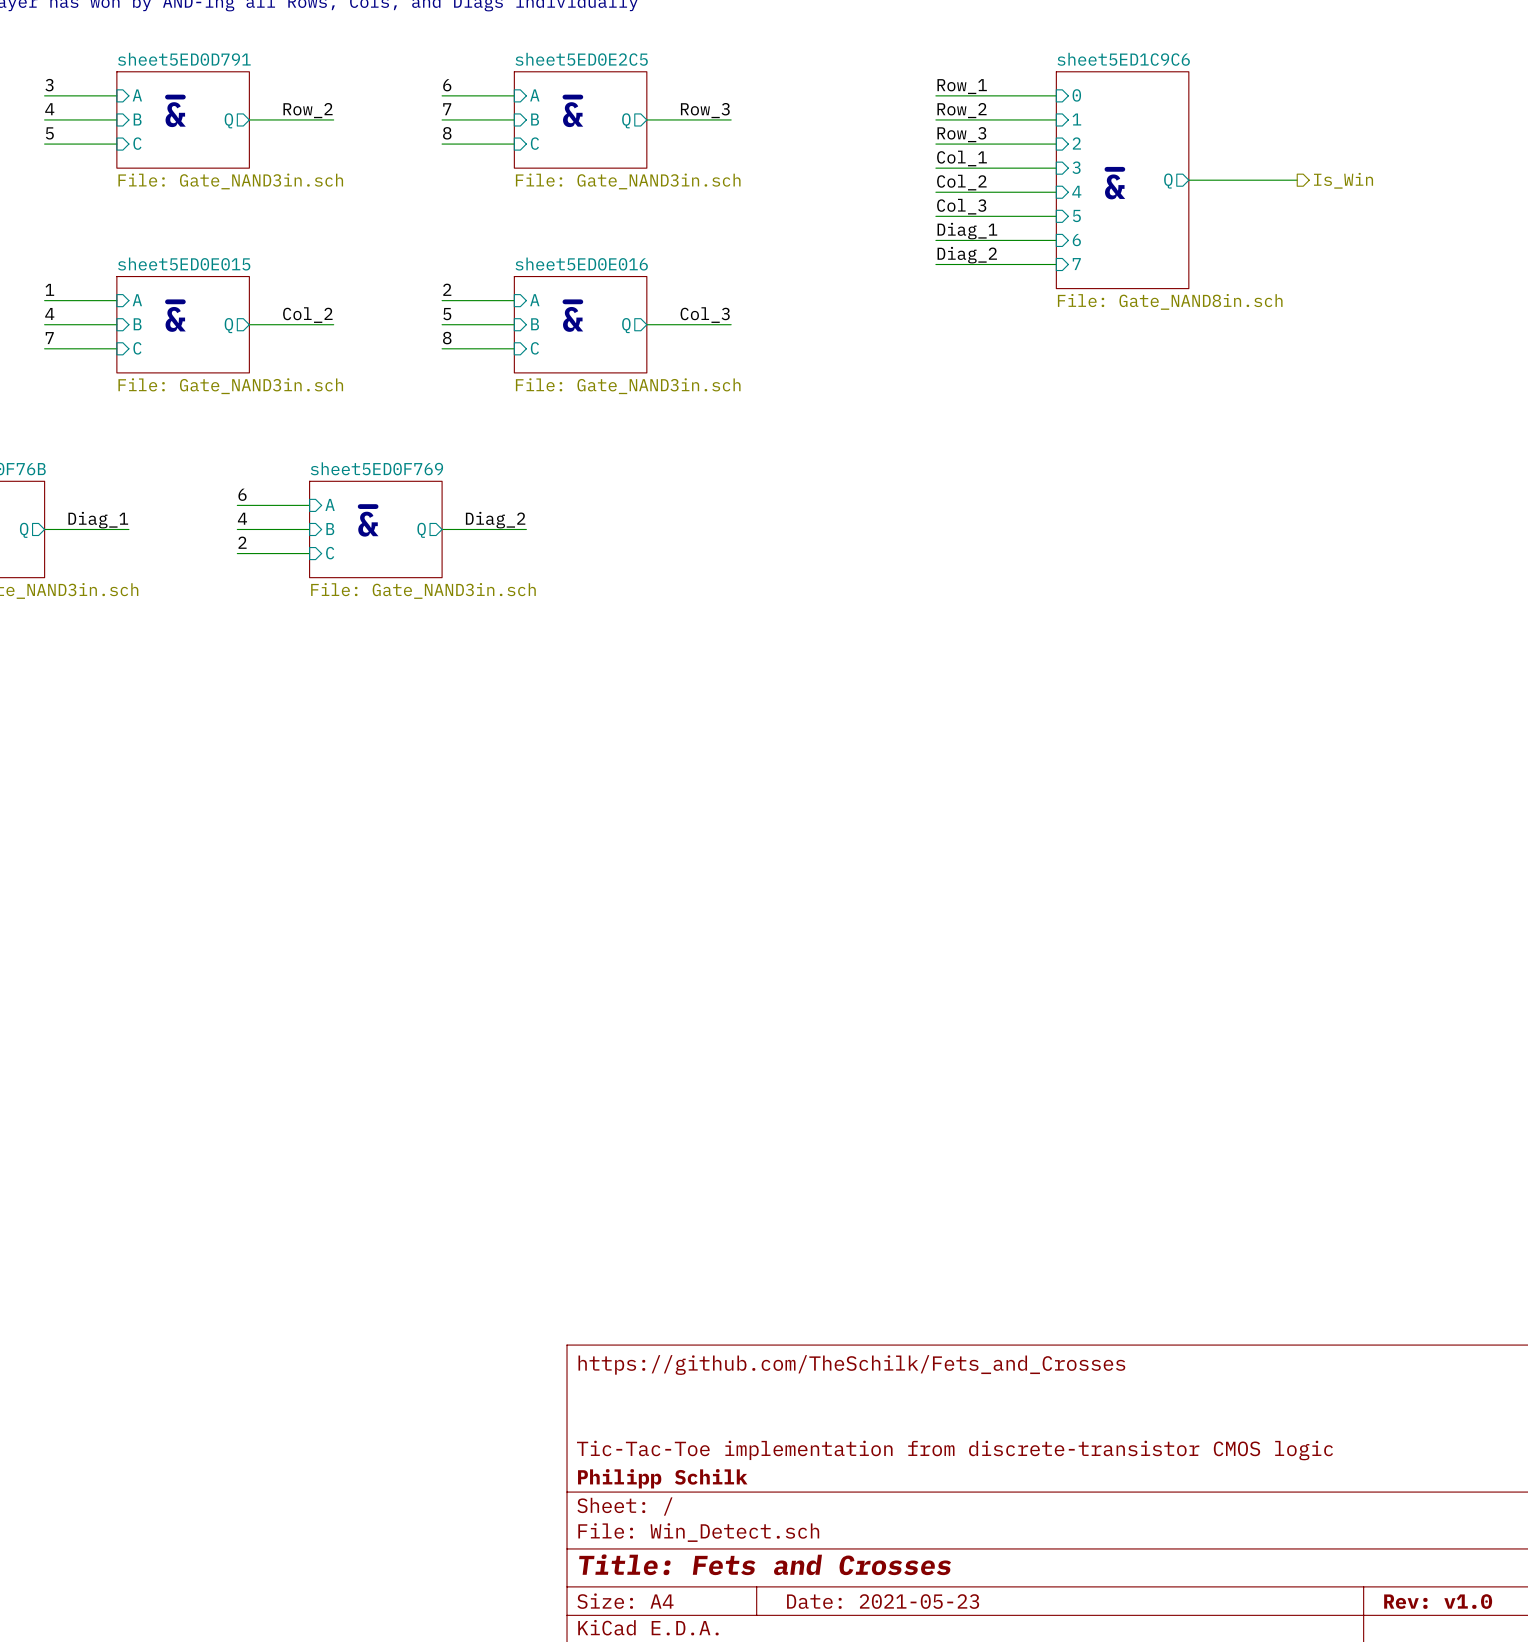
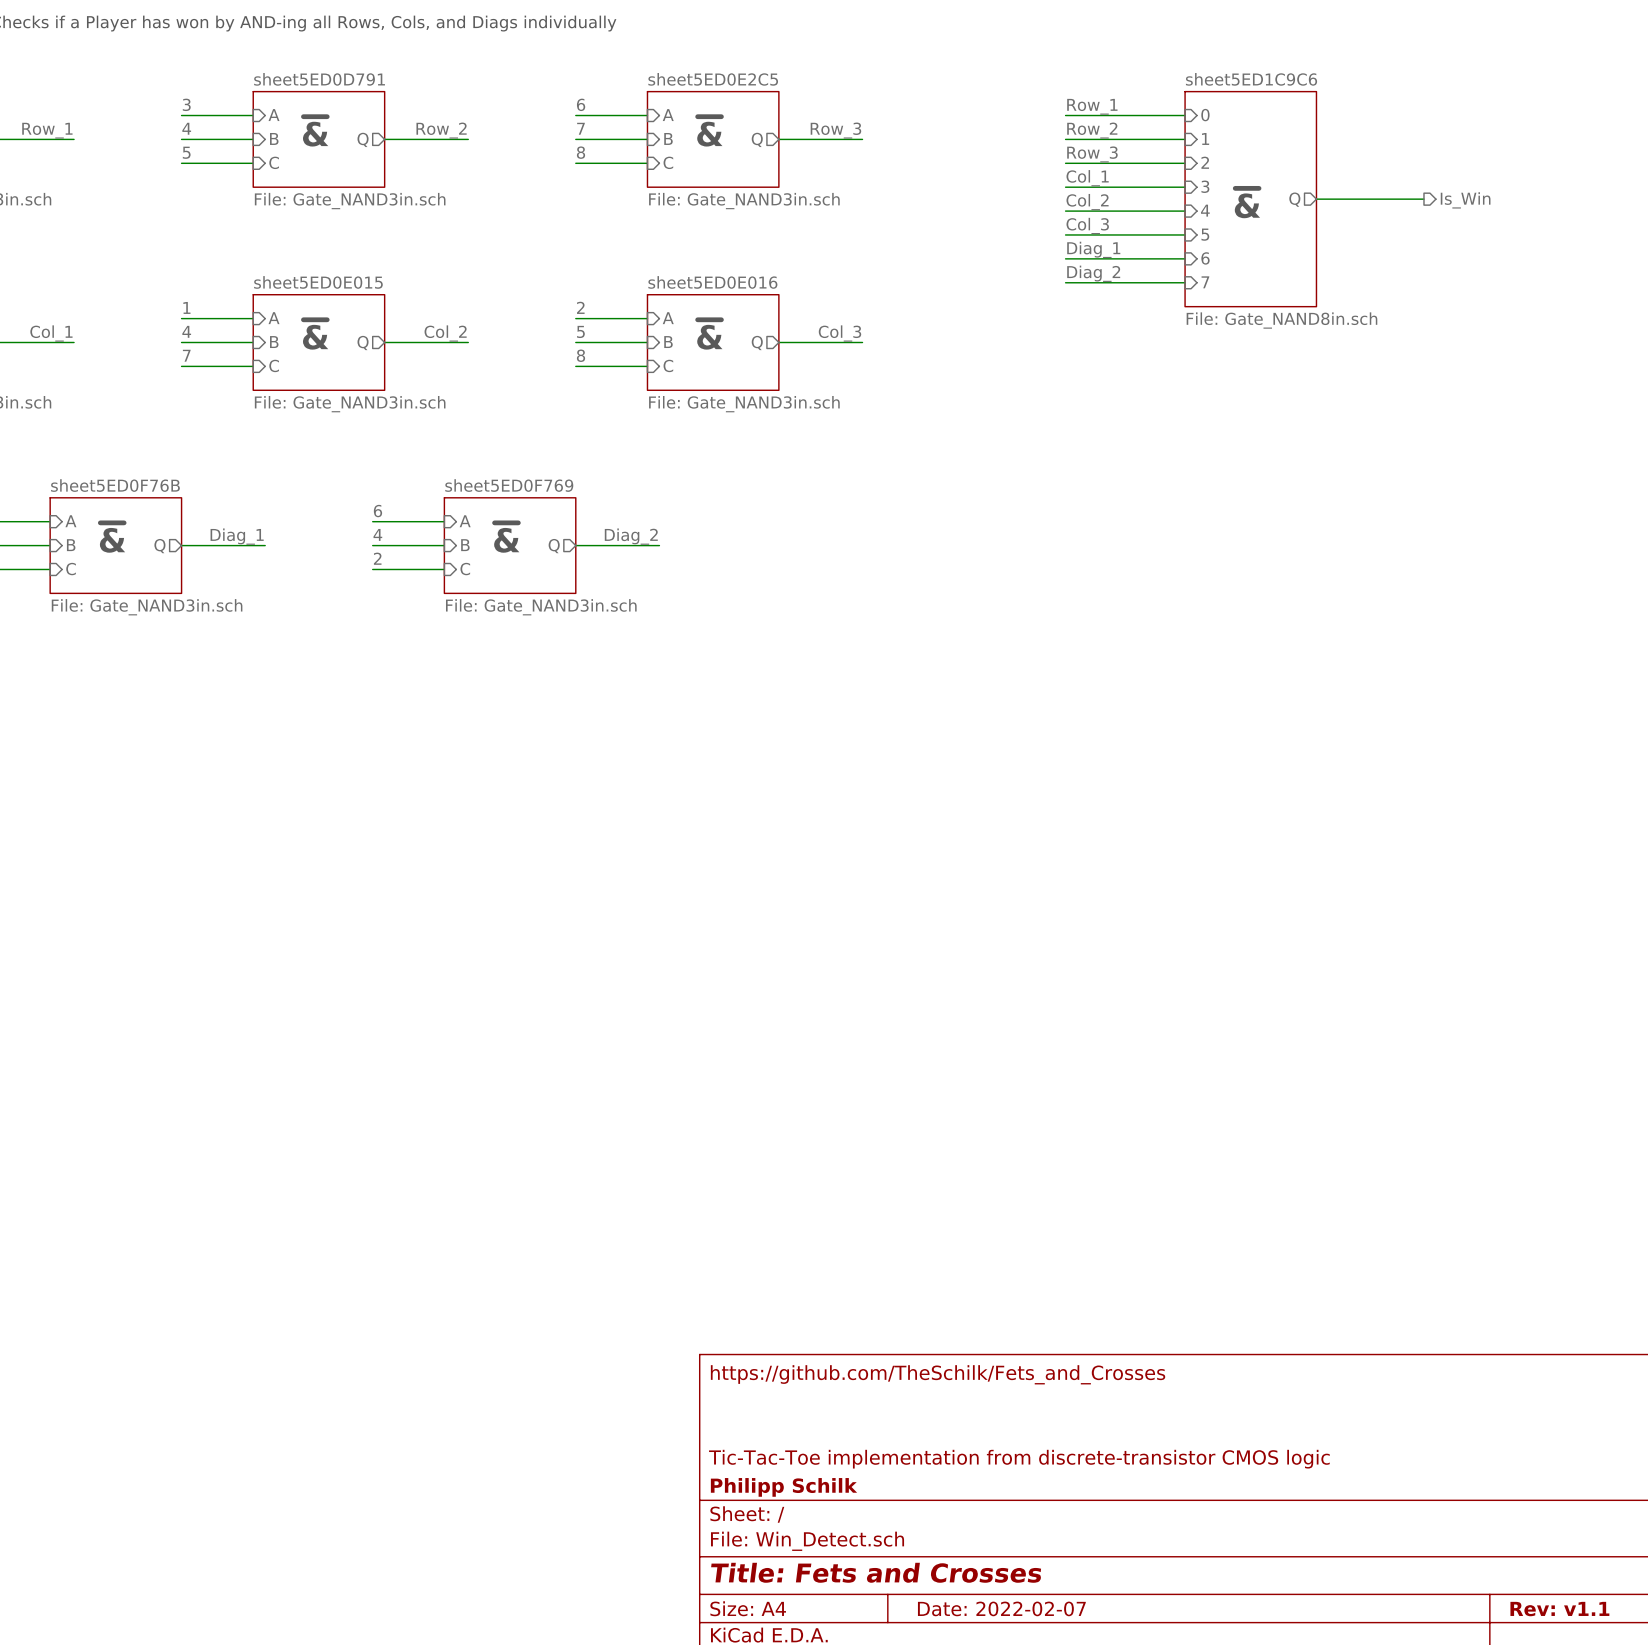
title block: Date: 2021-05-23 (883, 1601) -> Date: 2022-02-07 (1001, 1608)
title block: Rev: v1.0 (1438, 1601) -> Rev: v1.1 (1559, 1609)

